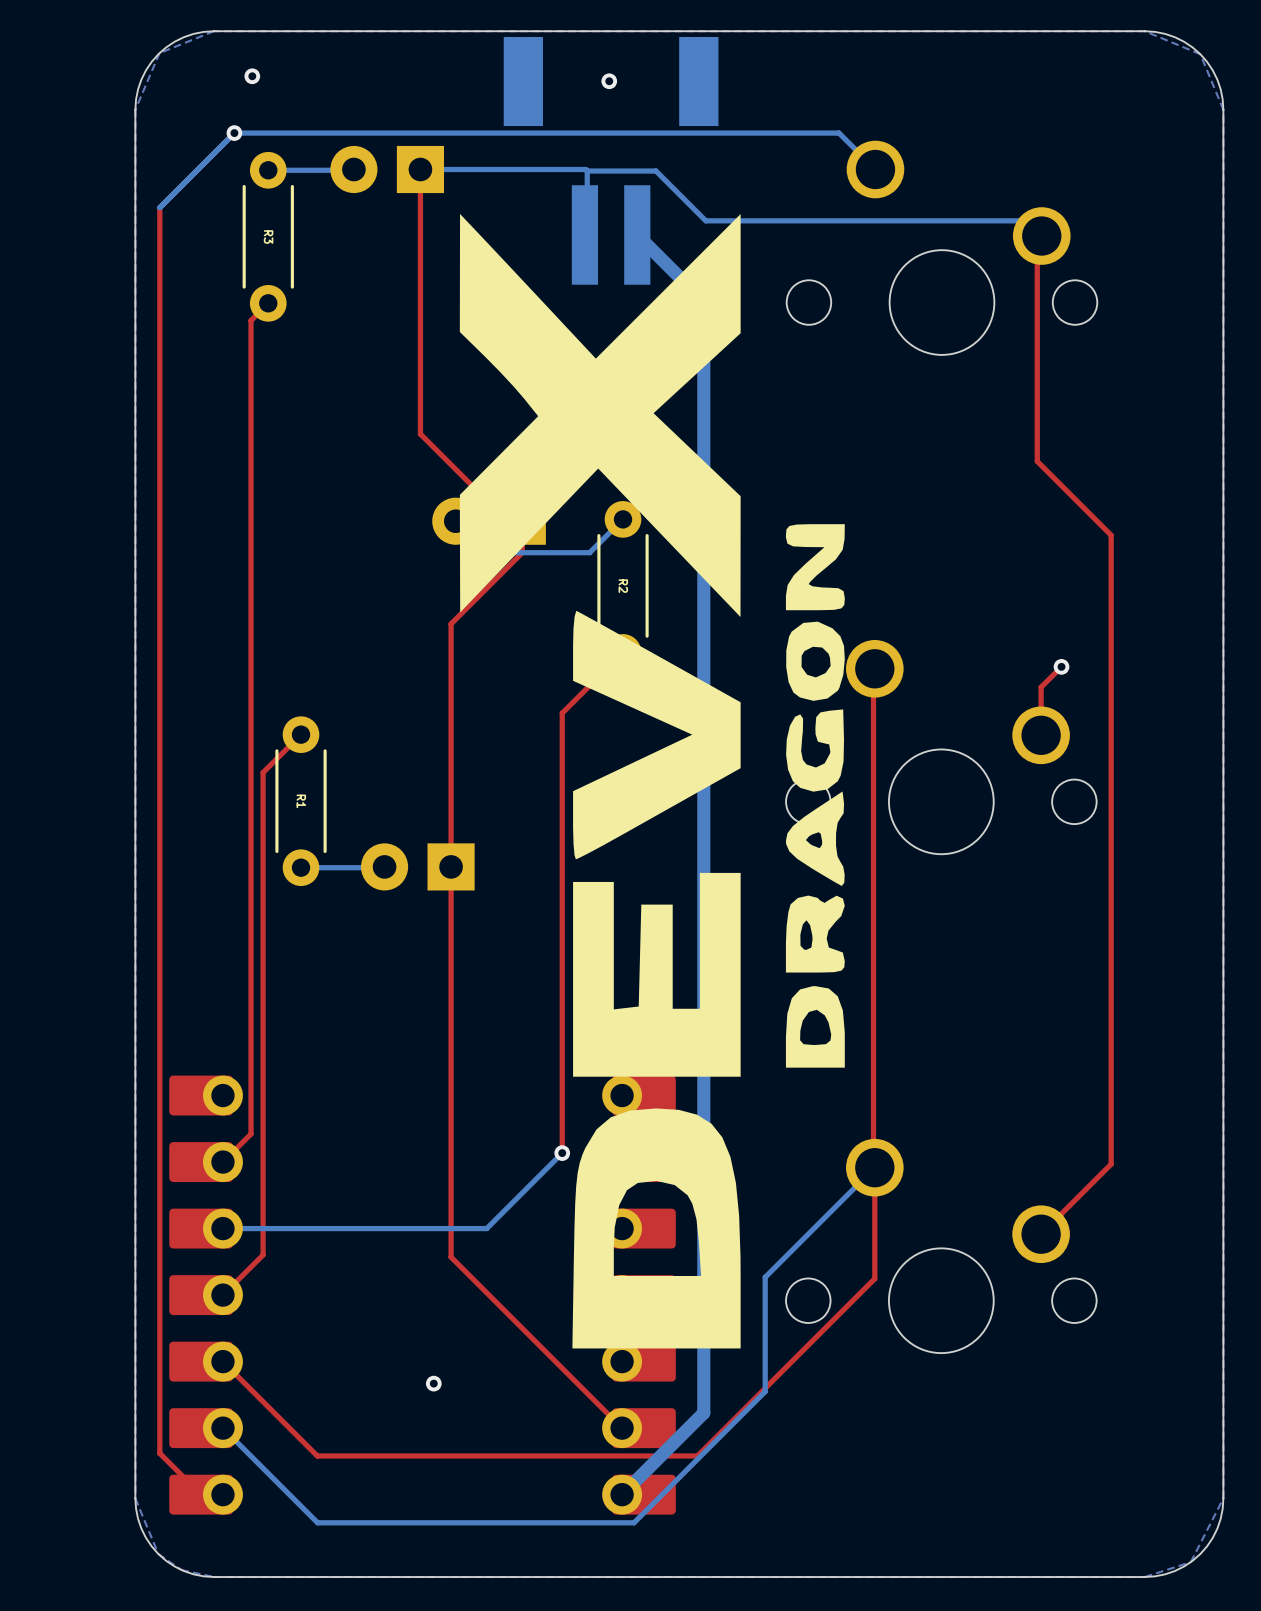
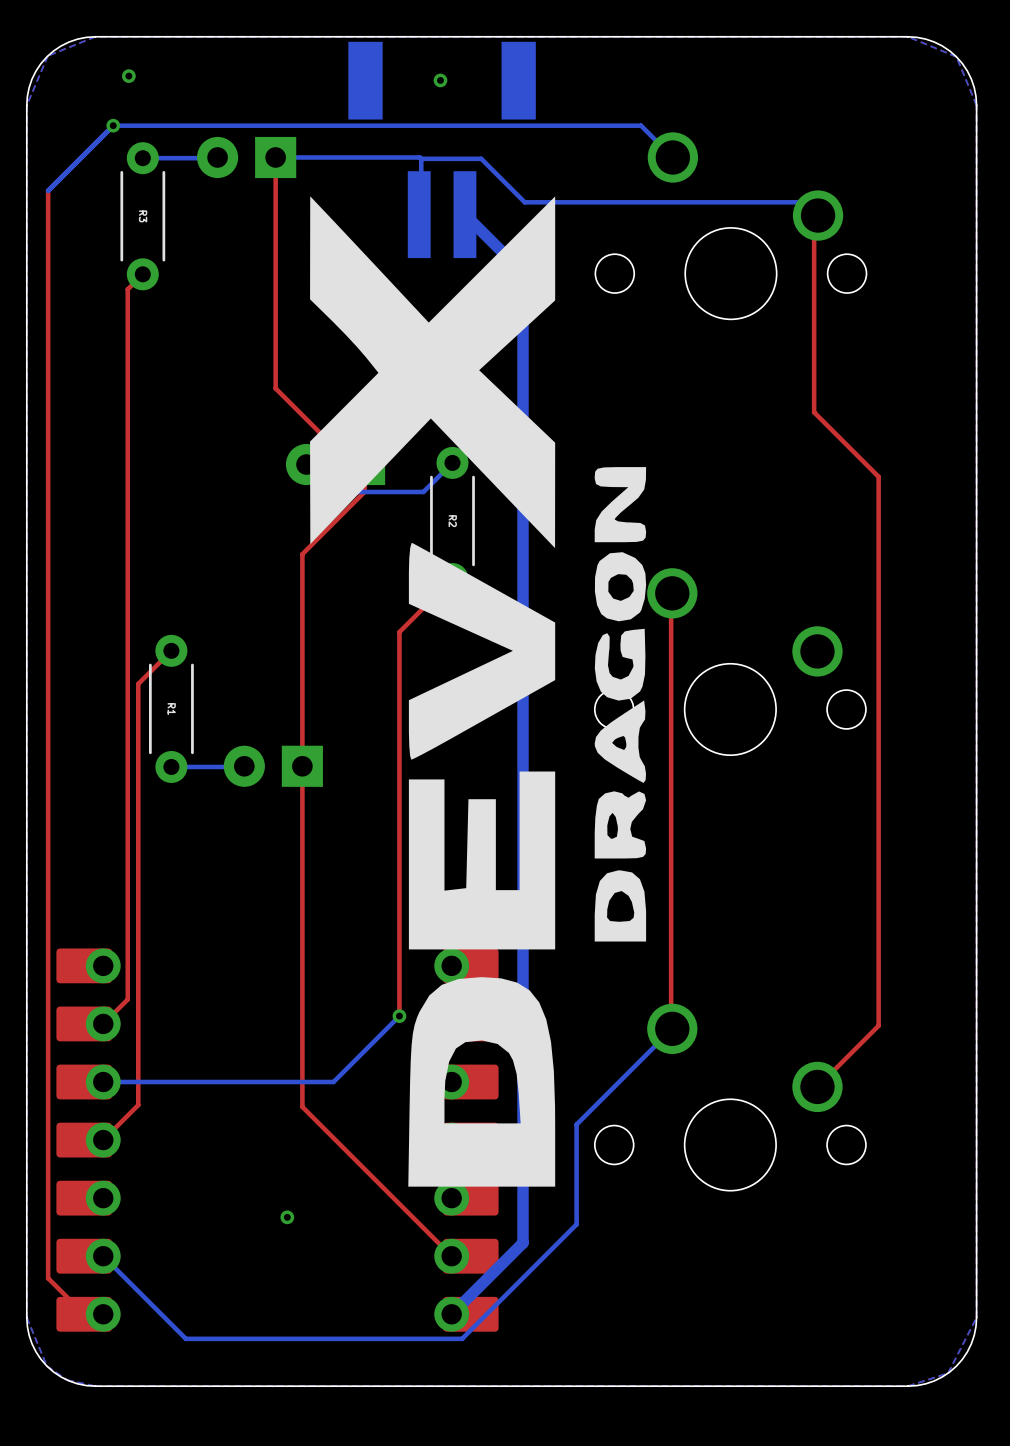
top track: (1061, 666) (1041, 687) (1041, 735) -> none
via: (1061, 666) -> none
top track: (874, 1178) (874, 1278) (697, 1455) (317, 1455) (222, 1361) -> none

